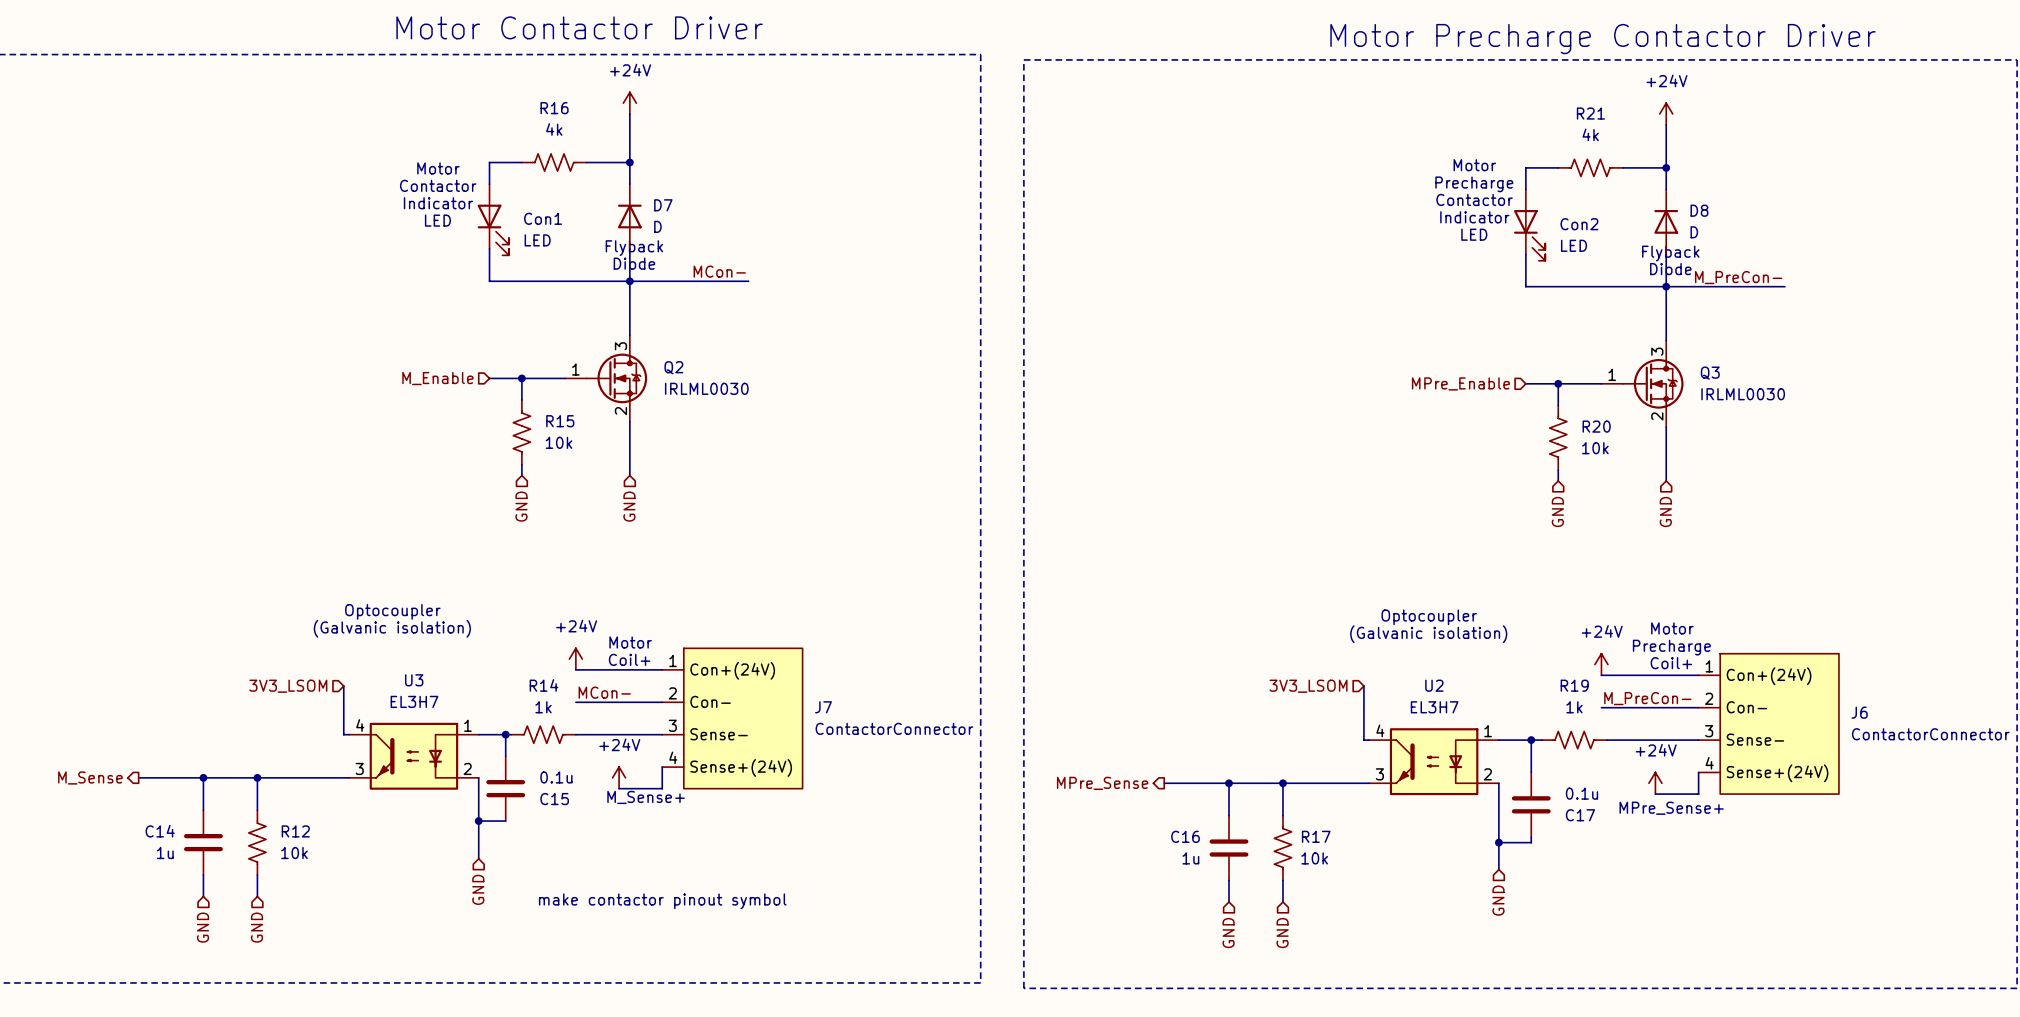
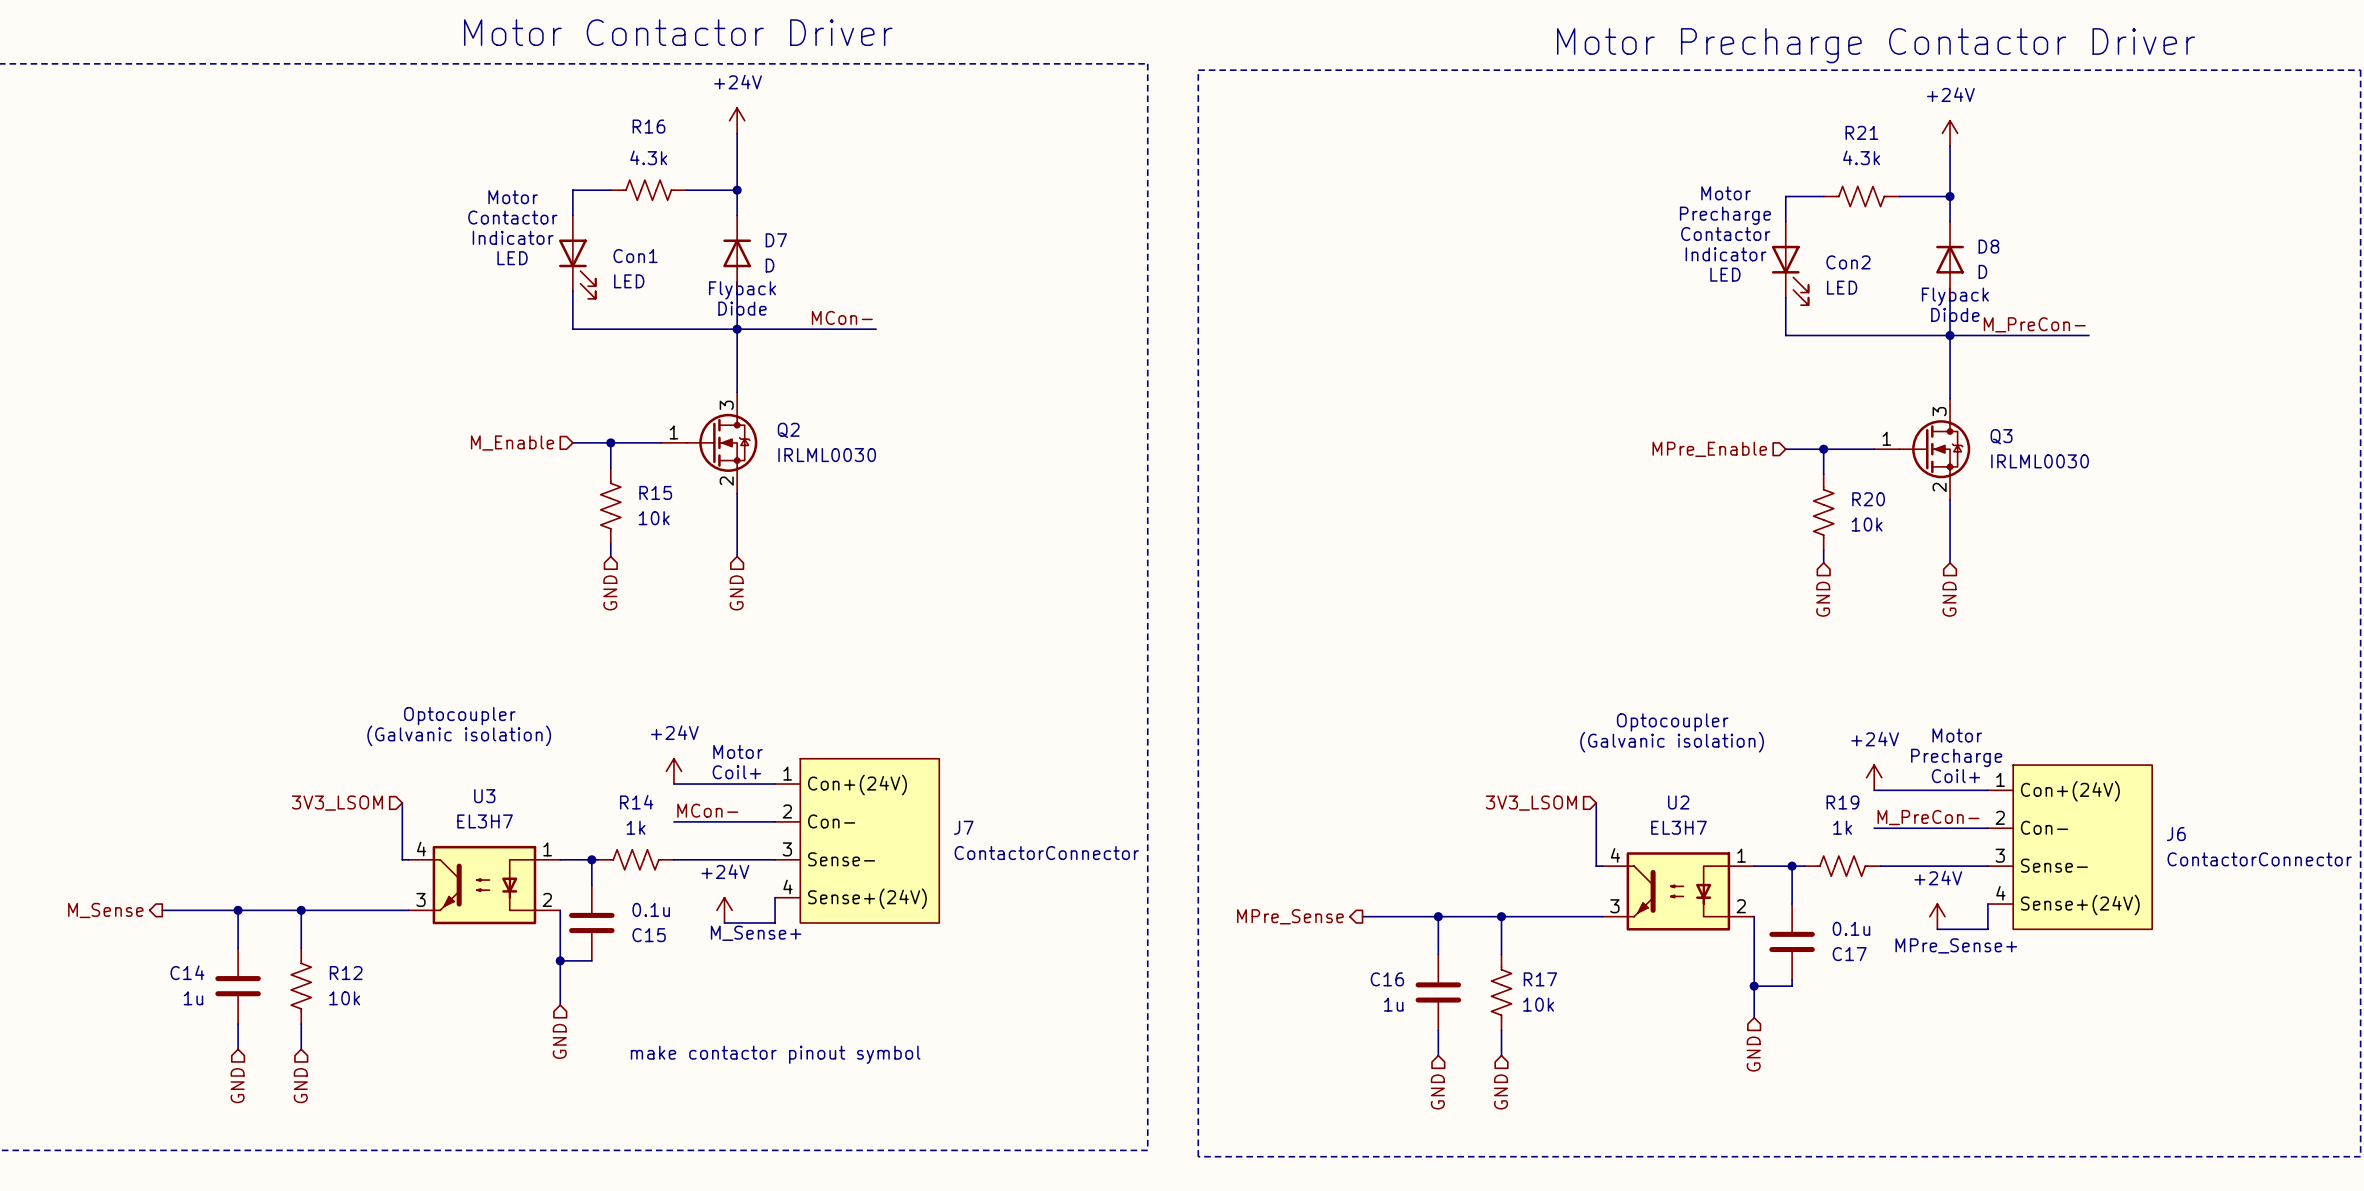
R16 value: 4k (554, 129) -> 4.3k (648, 157)
R21 value: 4k (1590, 134) -> 4.3k (1861, 157)

